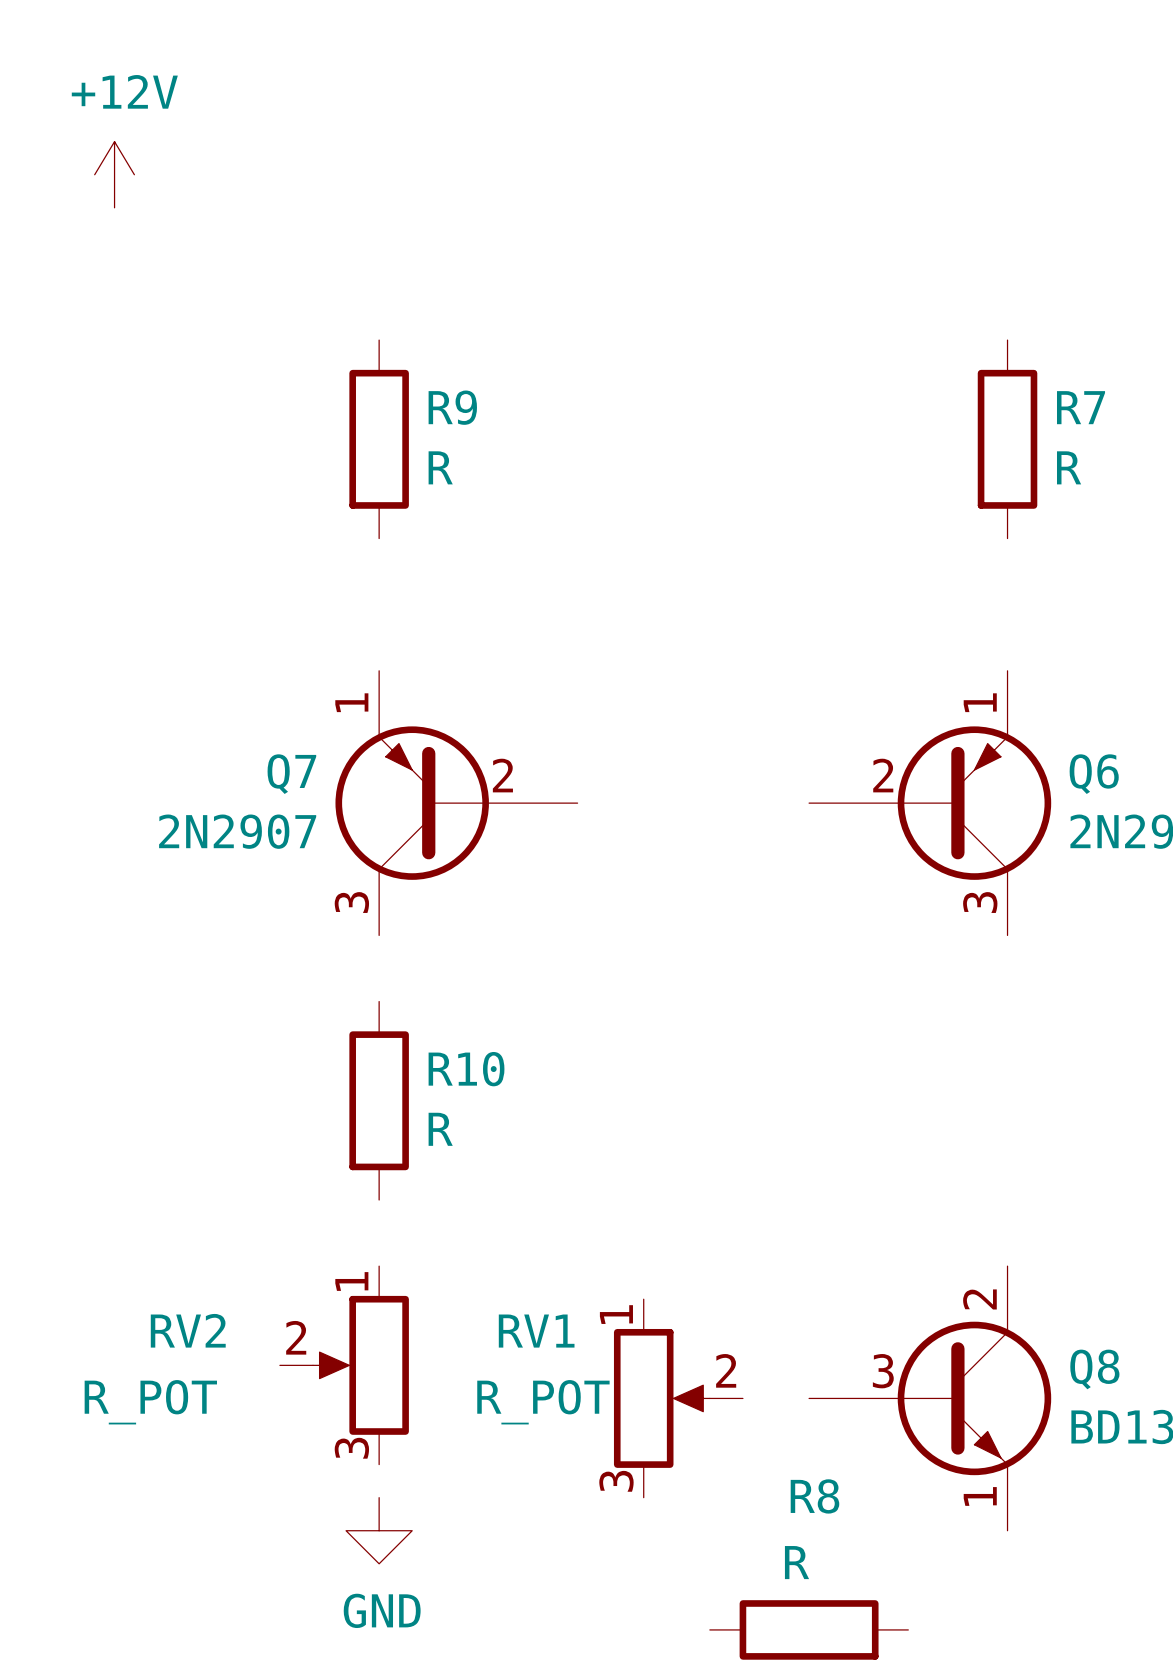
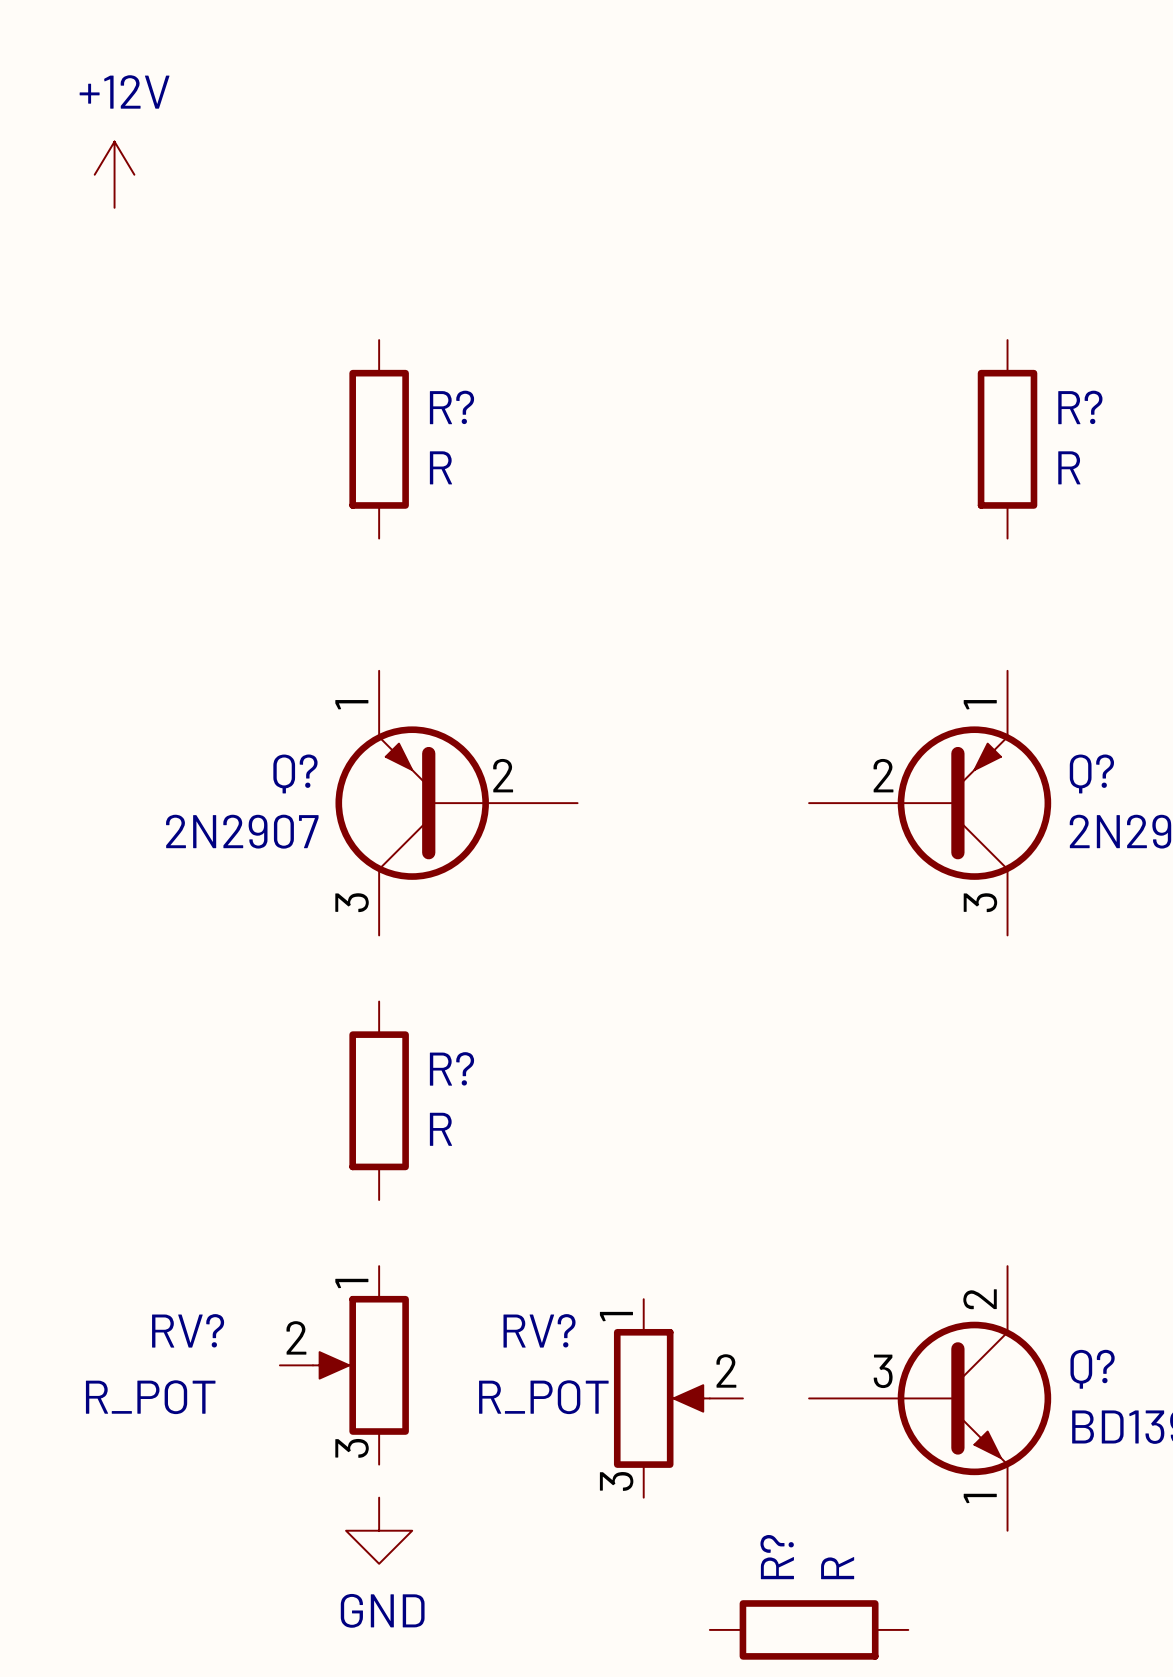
R9 name: R9 (452, 407) -> R? (451, 407)
R7 name: R7 (1081, 407) -> R? (1080, 407)
Q7 name: Q7 (291, 774) -> Q? (295, 773)
Q6 name: Q6 (1094, 774) -> Q? (1091, 773)
R10 name: R10 (466, 1069) -> R? (451, 1068)
RV2 name: RV2 (188, 1330) -> RV? (188, 1330)
RV1 name: RV1 (536, 1331) -> RV? (539, 1330)
Q8 name: Q8 (1094, 1369) -> Q? (1092, 1369)
R8 name: R8 (814, 1496) -> R? (777, 1557)
R8 value rotation: 0° (797, 1562) -> 90° counterclockwise (837, 1568)

